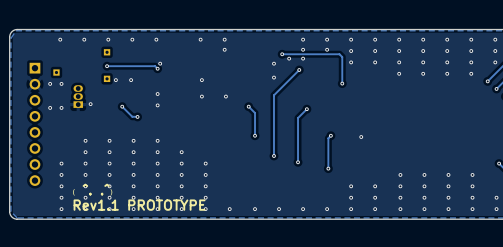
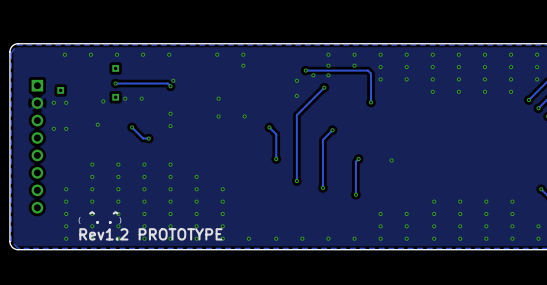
via: none -> (103, 101)
part: (78, 96) -> none
text: Rev1.1 PROTOTYPE (139, 205) -> Rev1.2 PROTOTYPE (150, 234)

